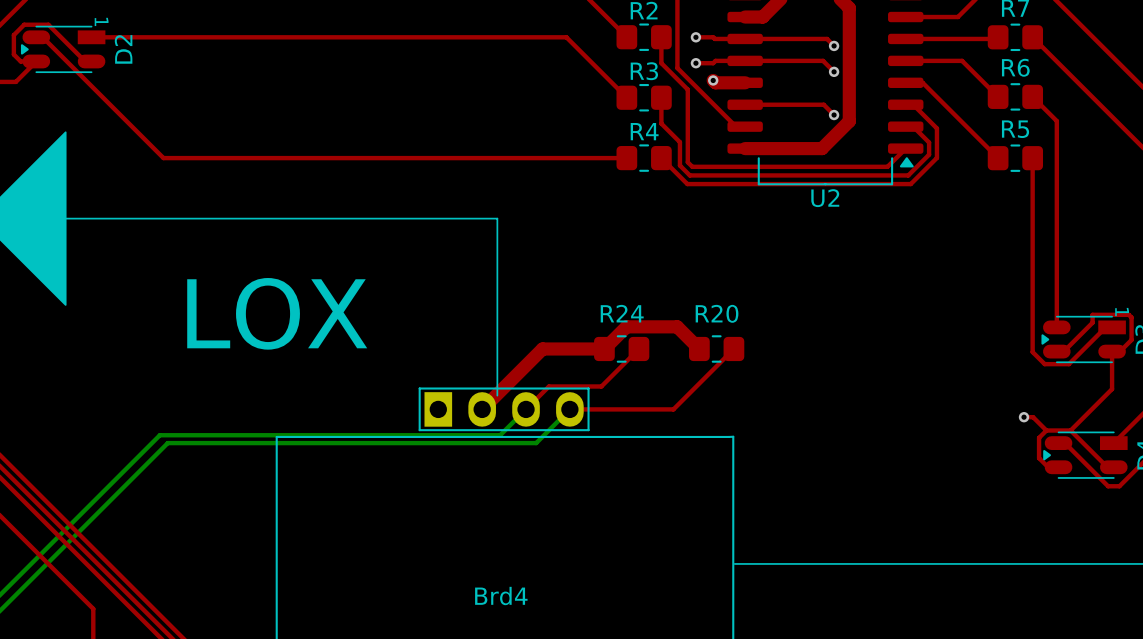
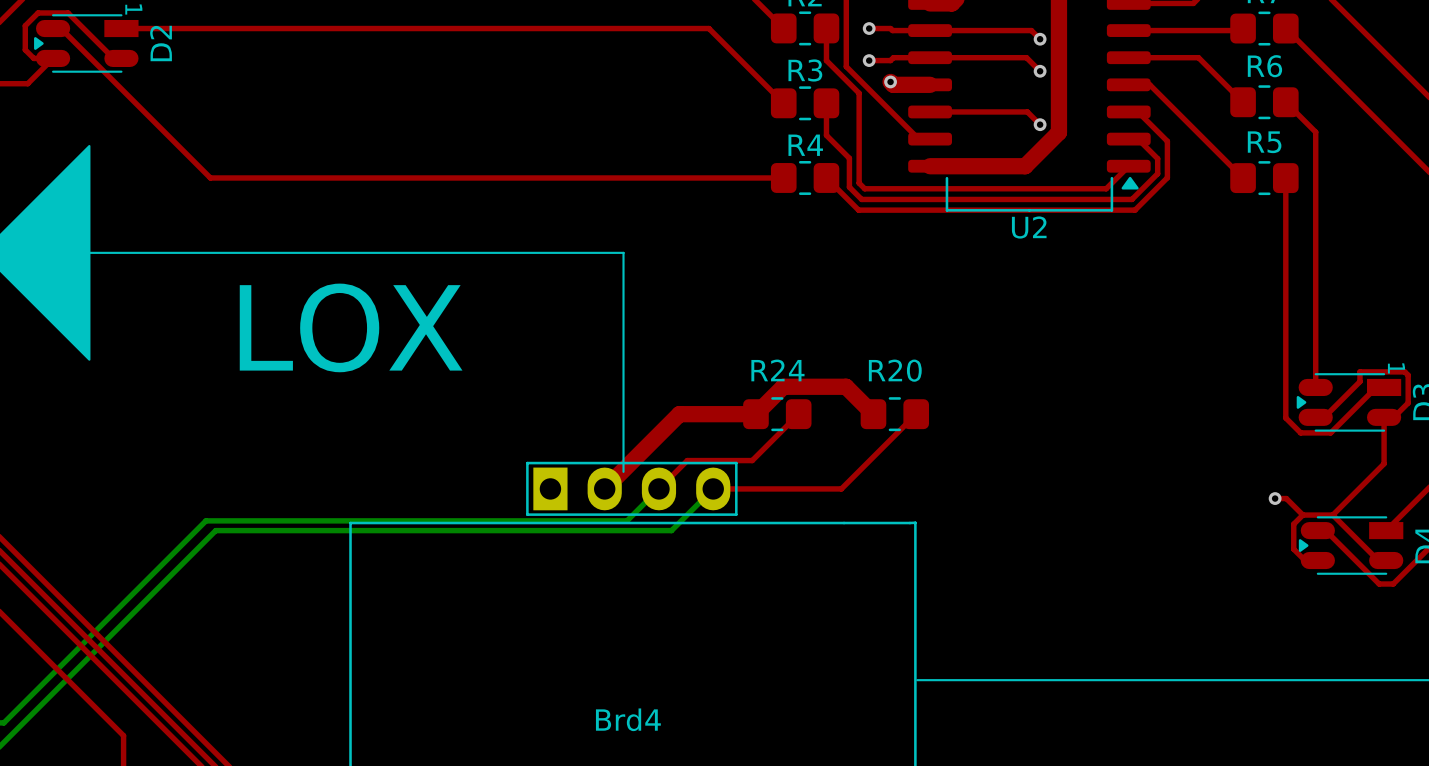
text position: LOX (277, 313) -> LOX (351, 327)

